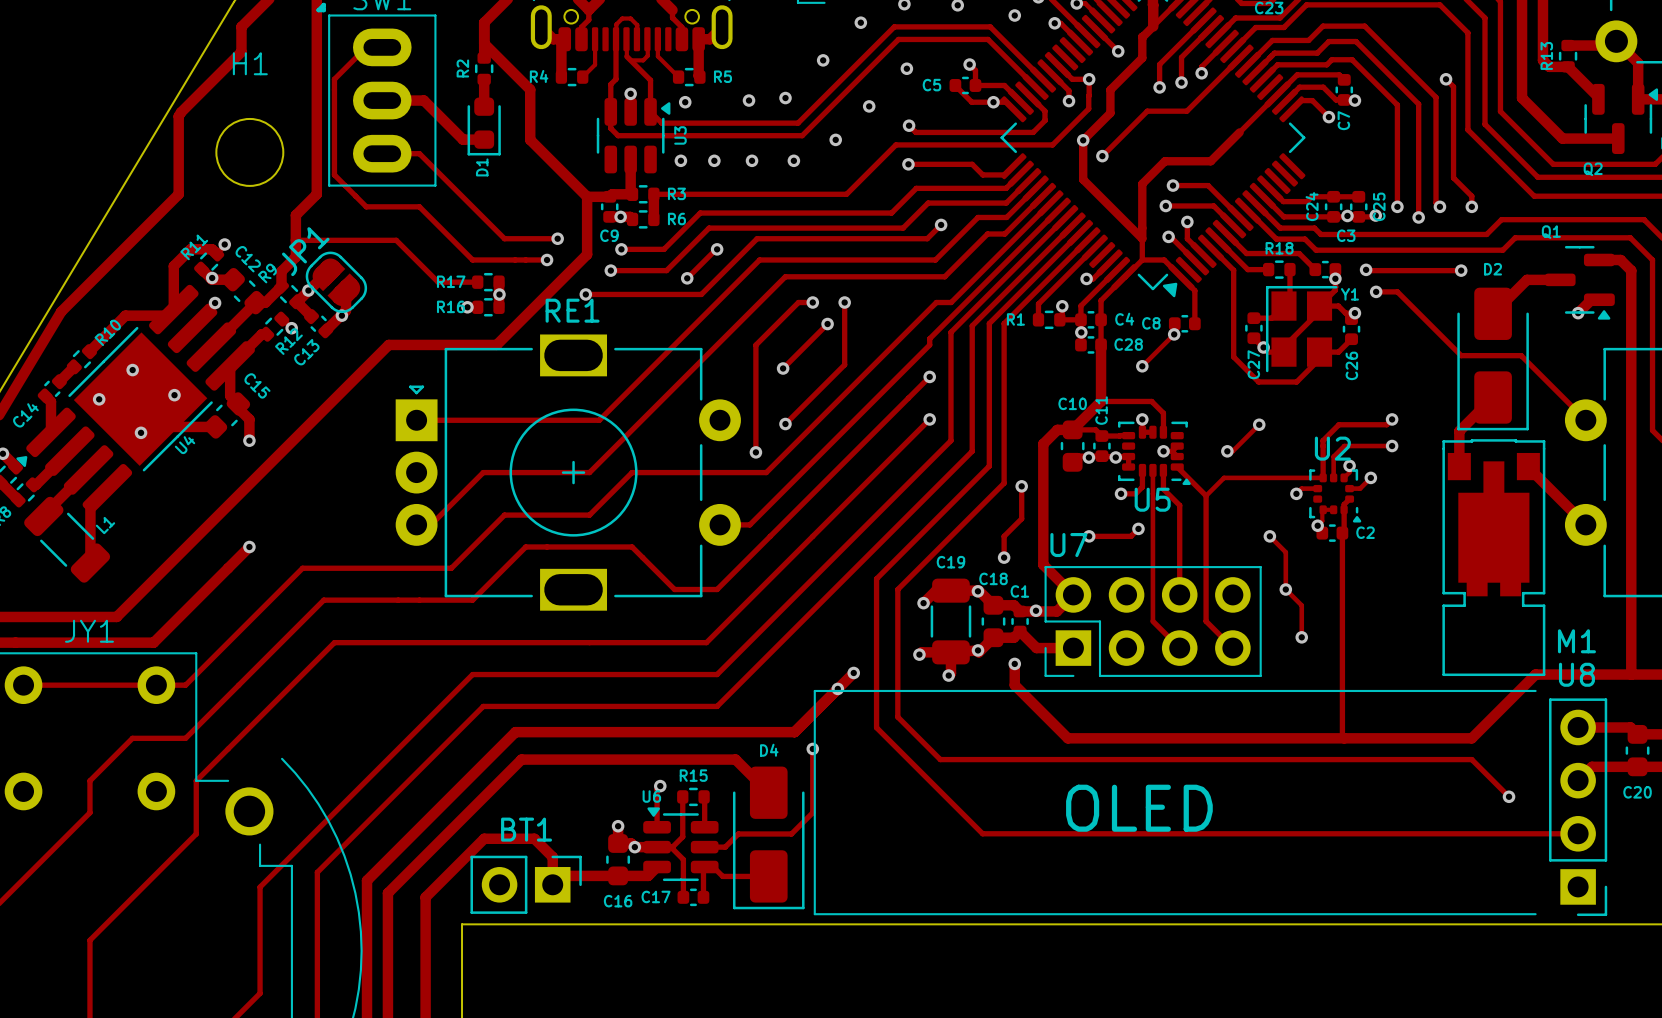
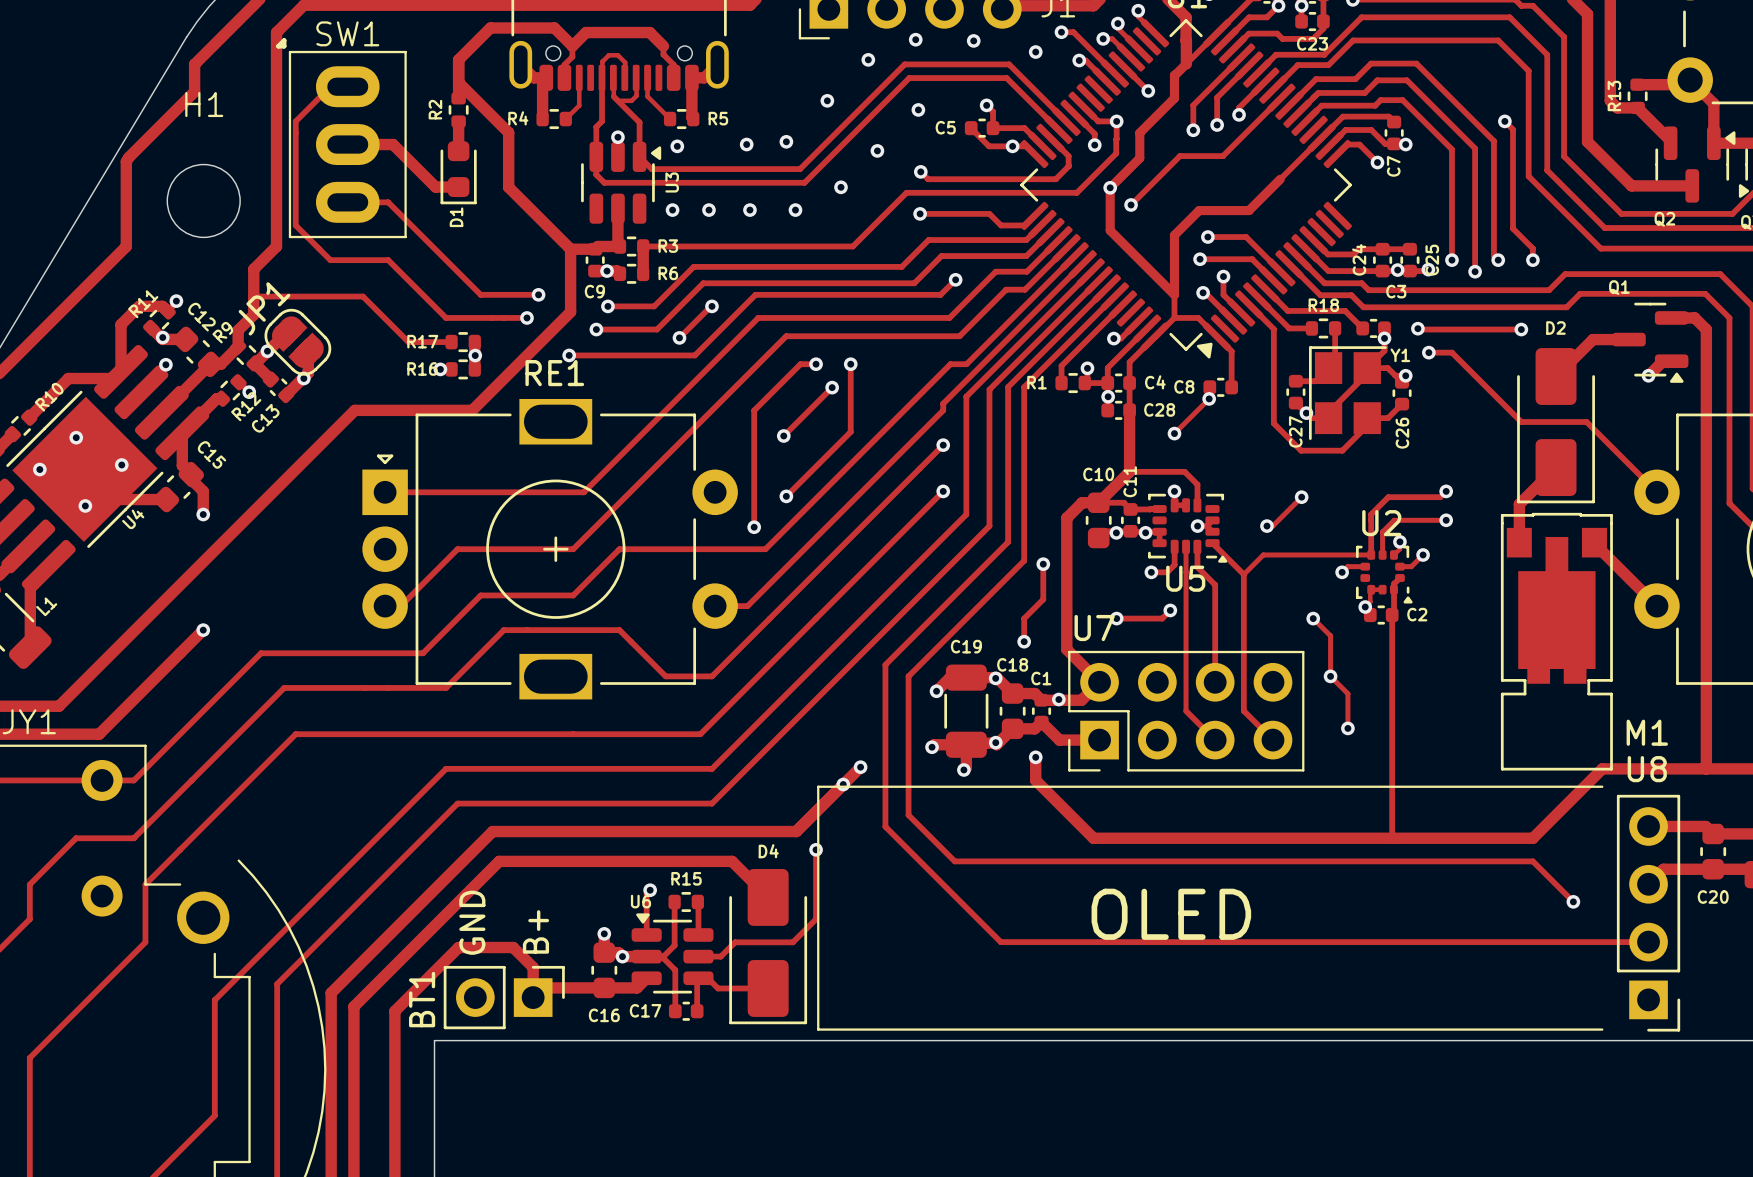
text: none -> GND (472, 922)
text: none -> B+ (535, 931)
BT1 name rotation: 0° (526, 829) -> 90° counterclockwise (422, 999)
BT1 name position: BT1 (526, 829) -> BT1 (422, 999)

